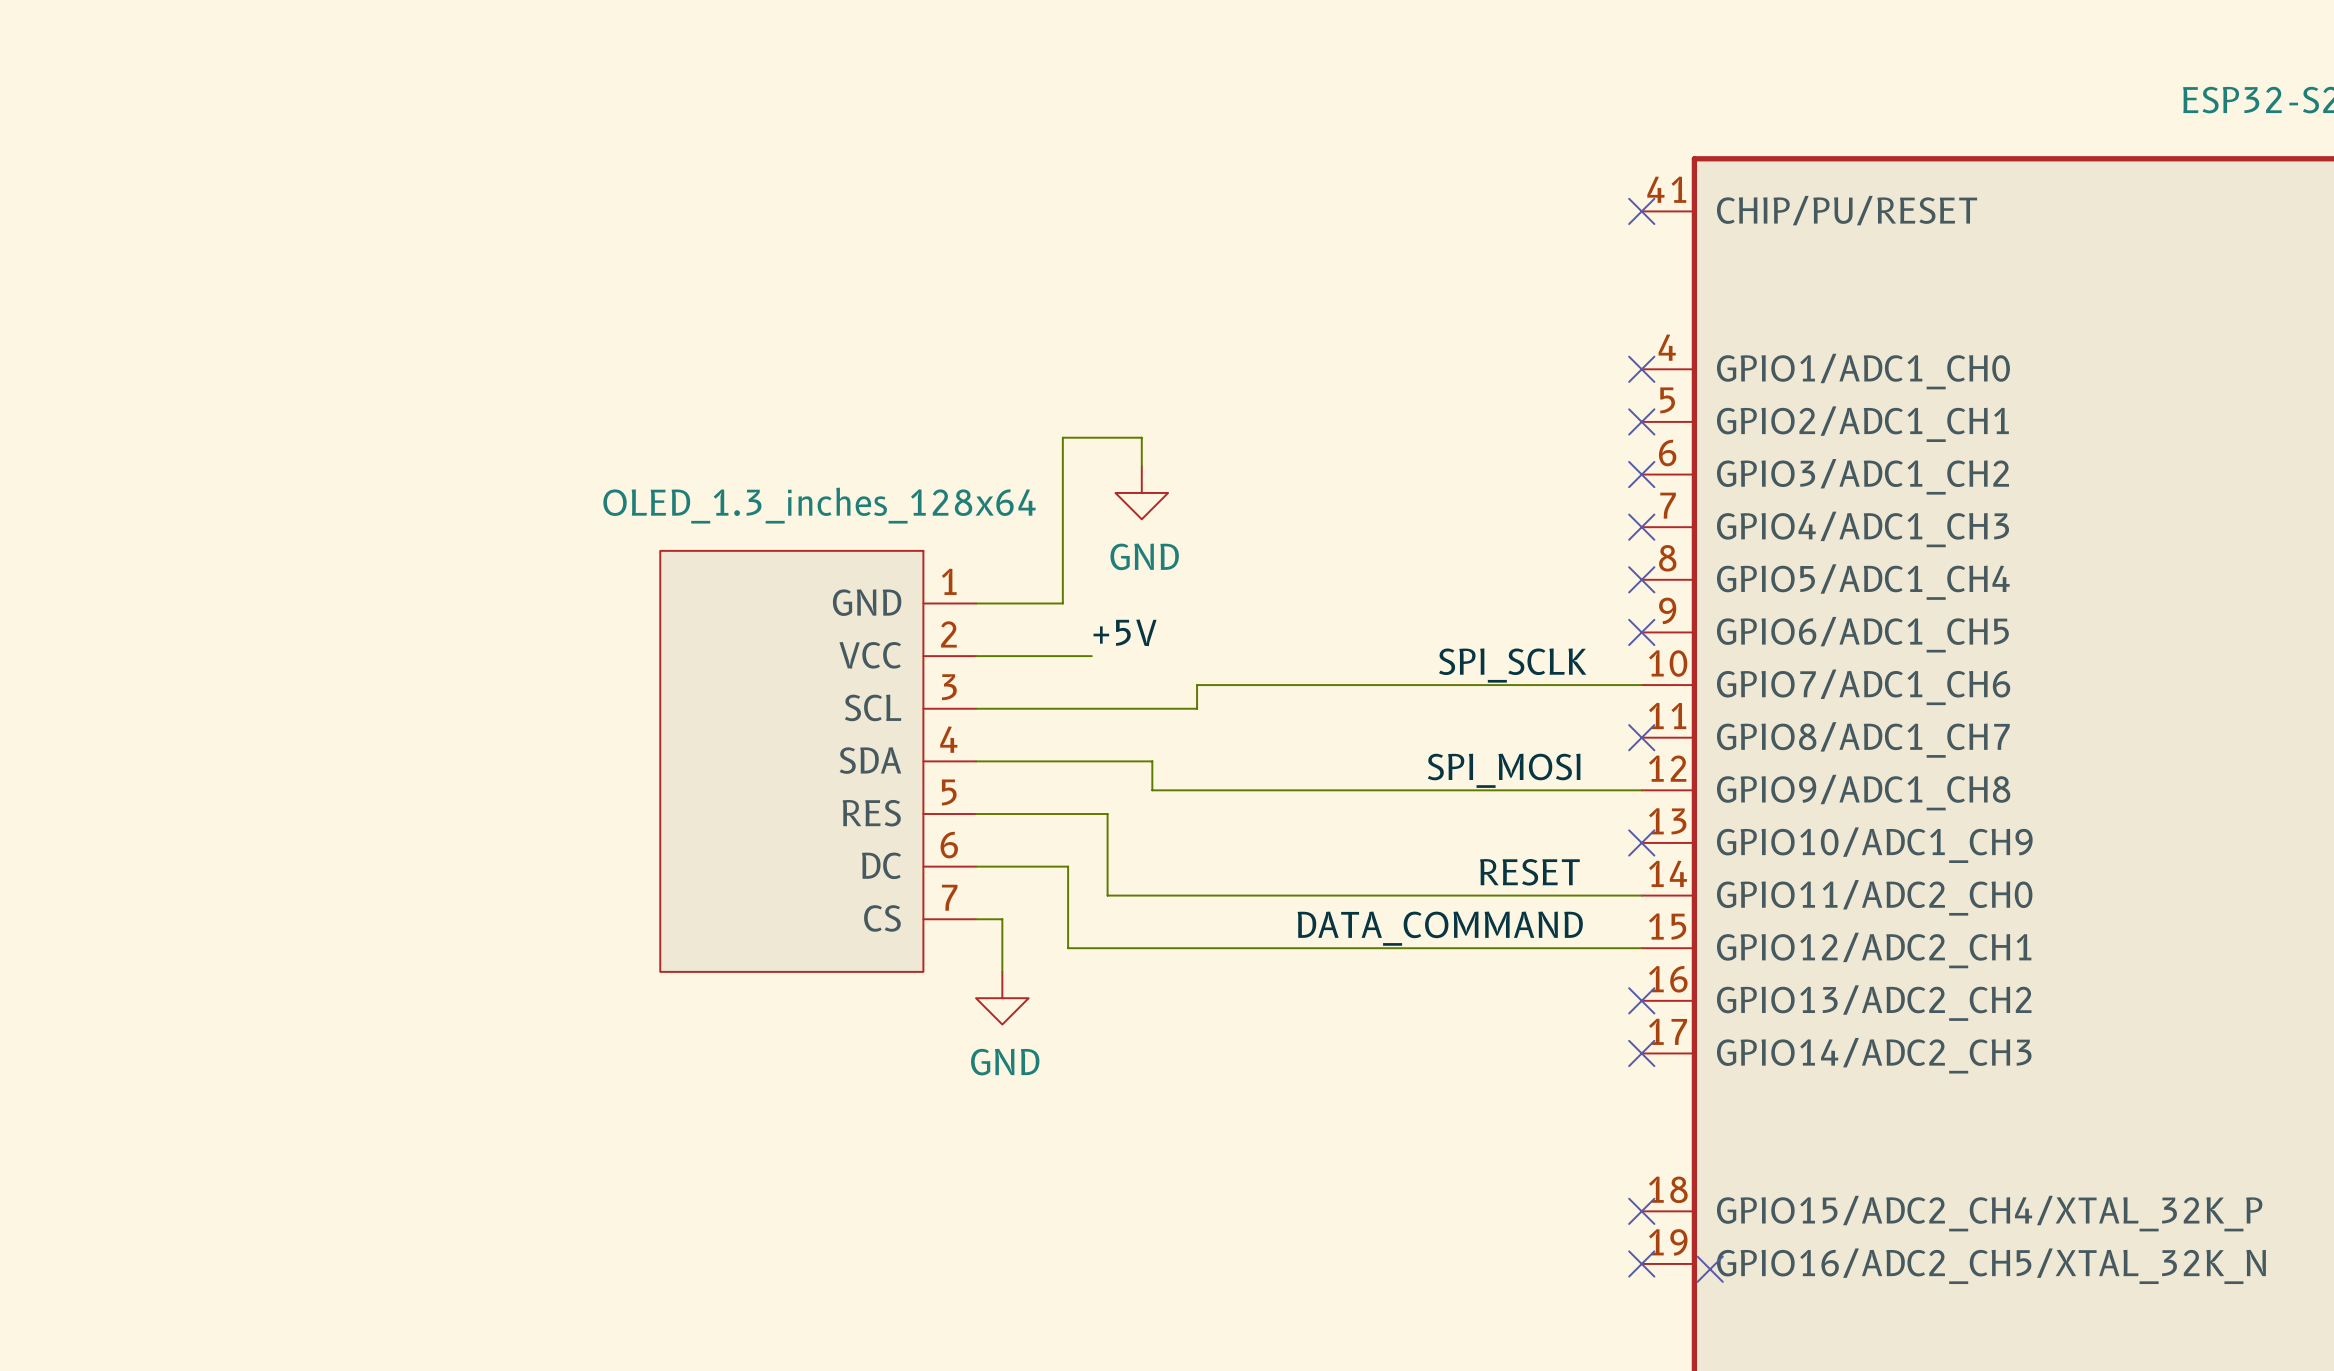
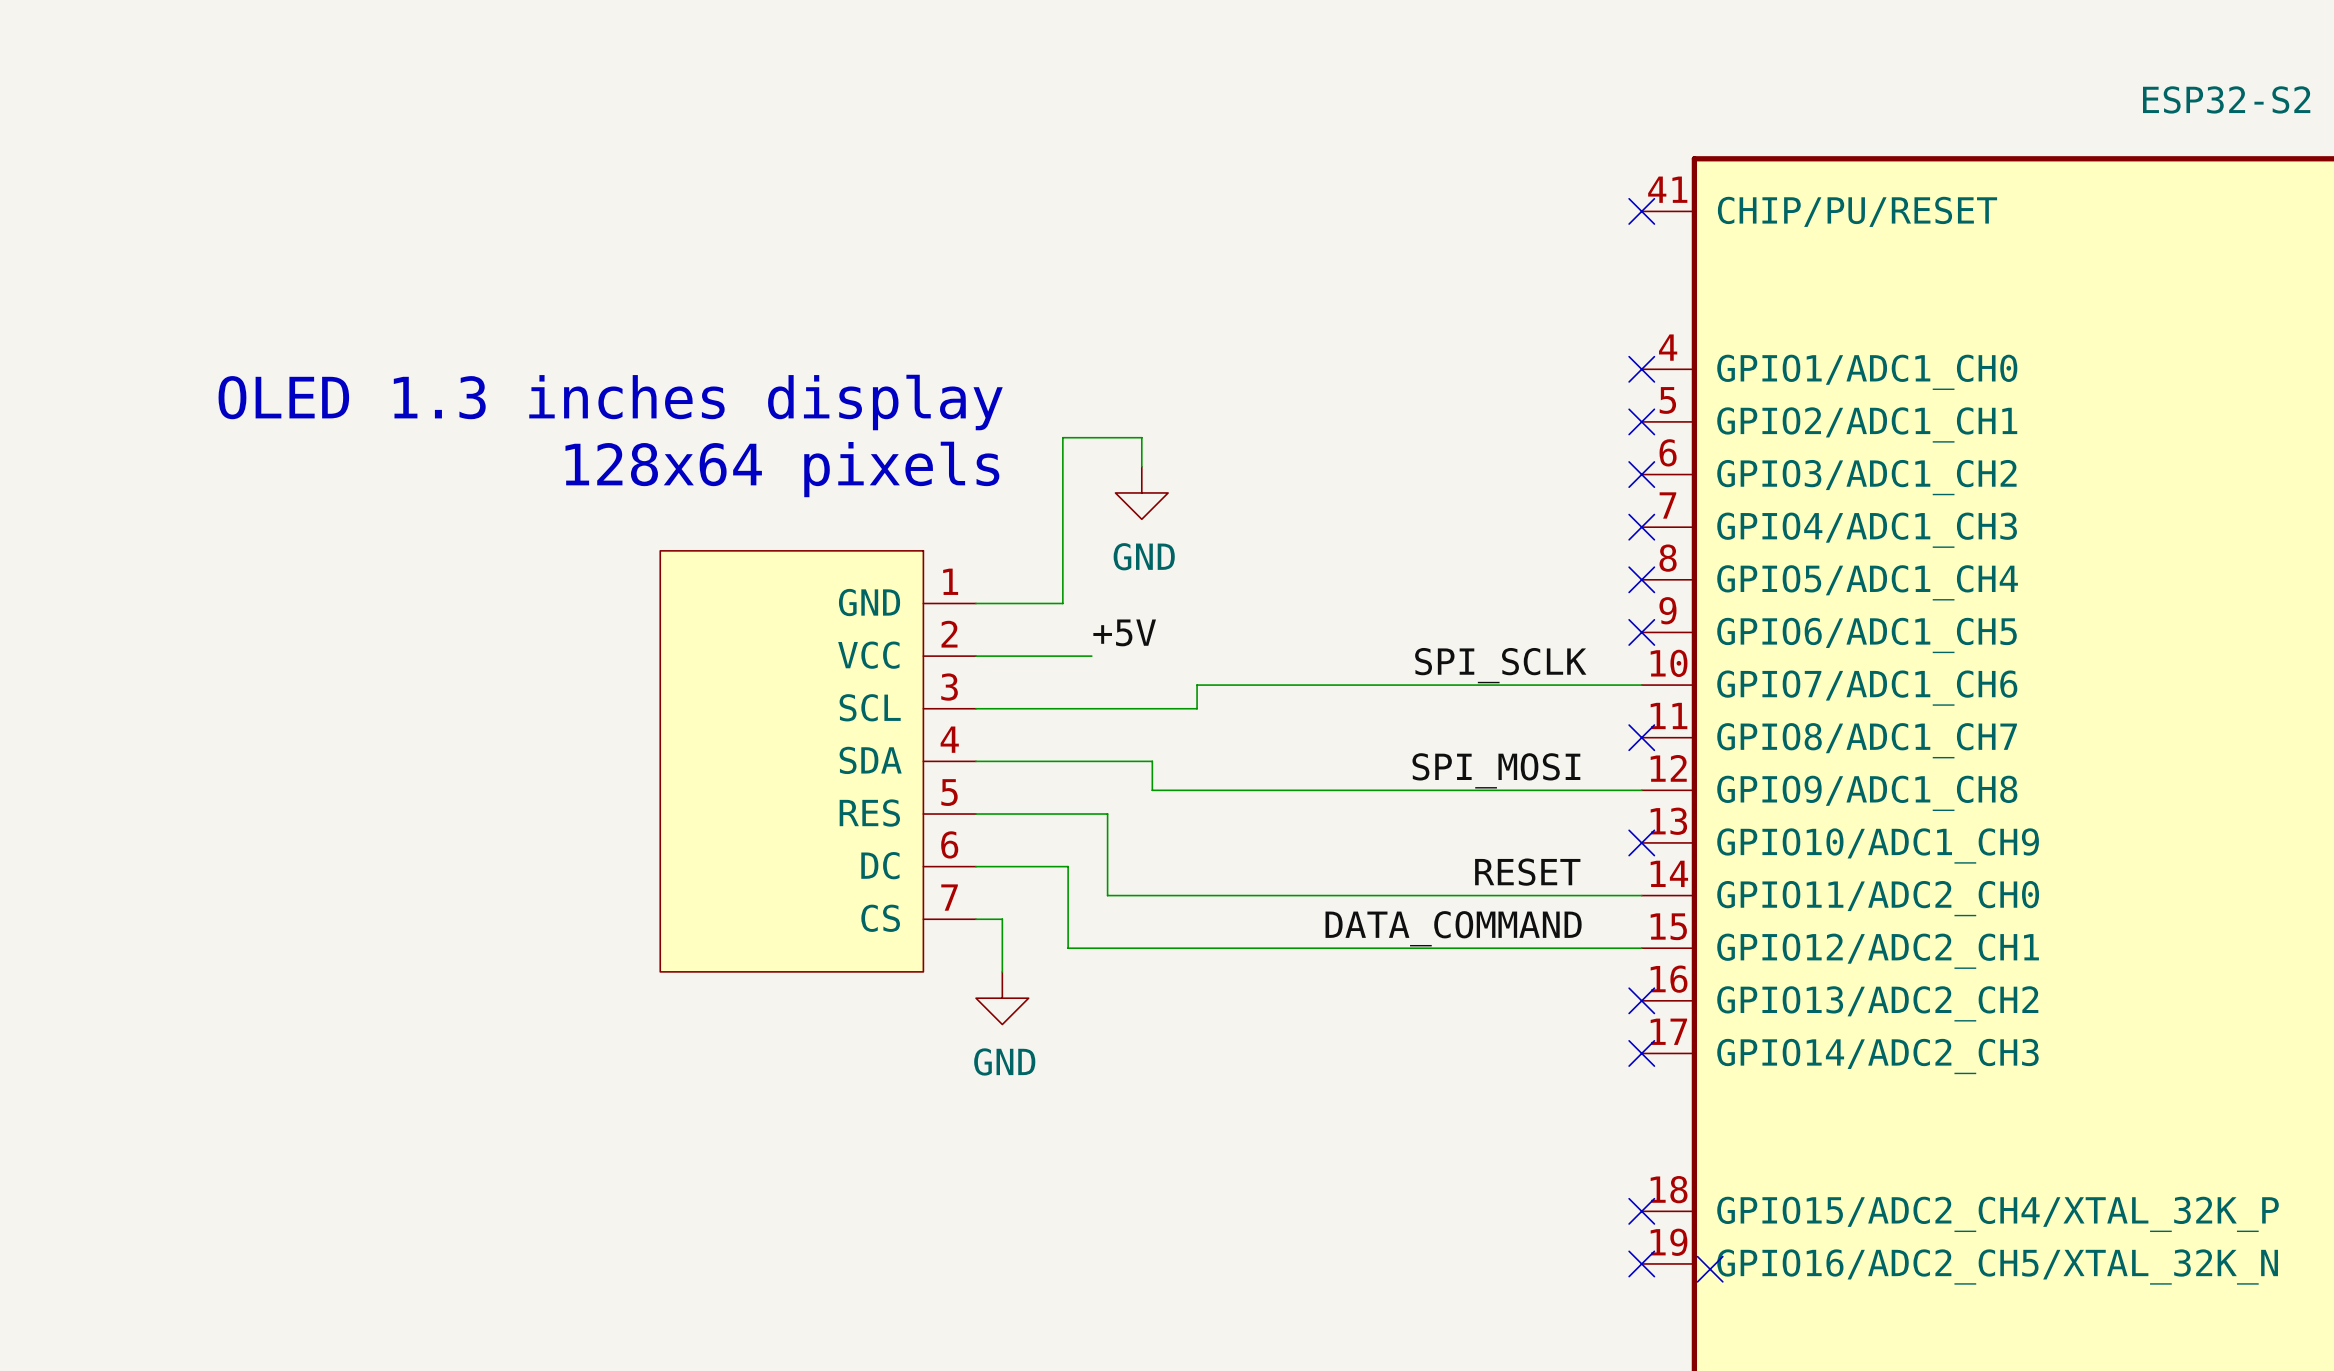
text: none -> OLED 1.3 inches display (610, 402)
text: none -> 128x64 pixels (782, 469)
part value: OLED_1.3_inches_128x64 (819, 505) -> none

